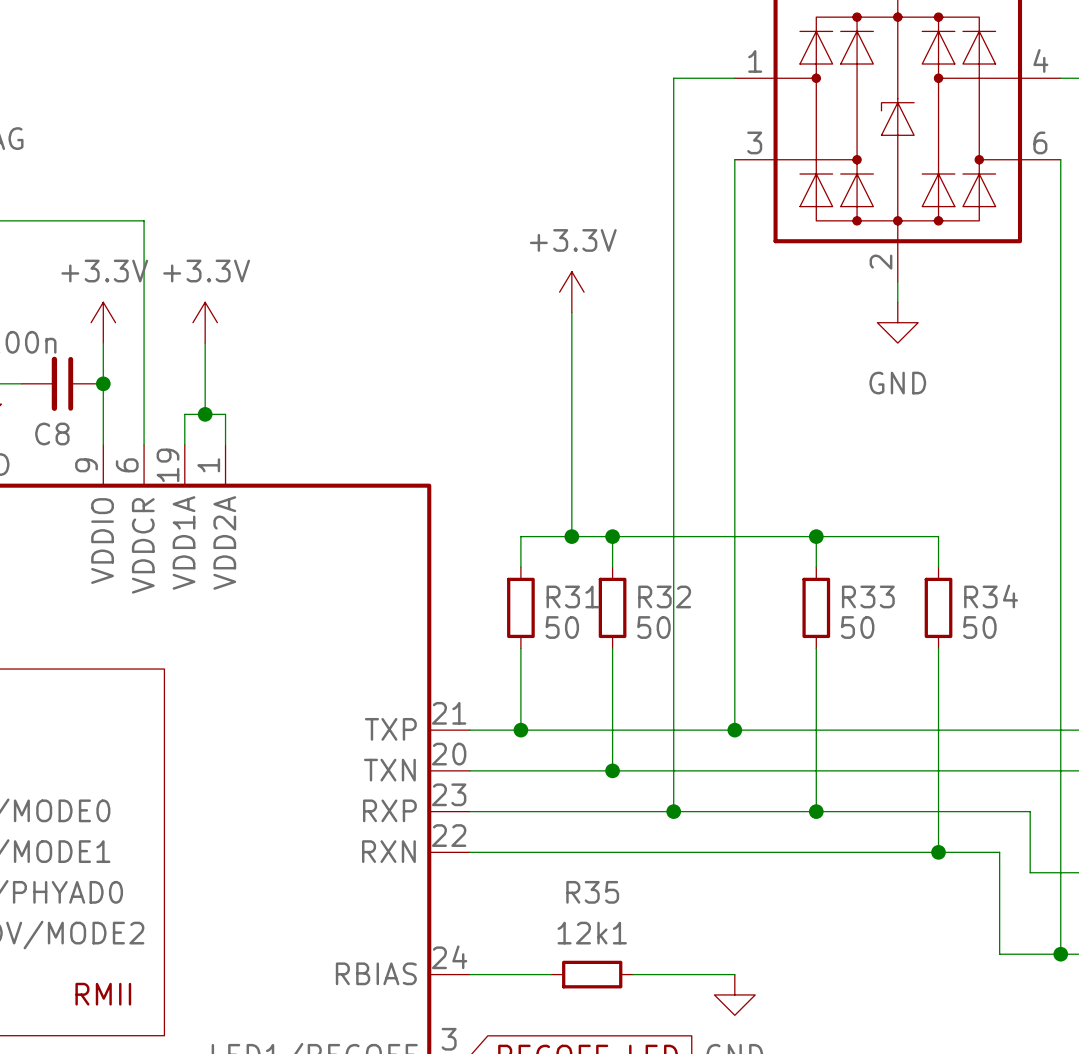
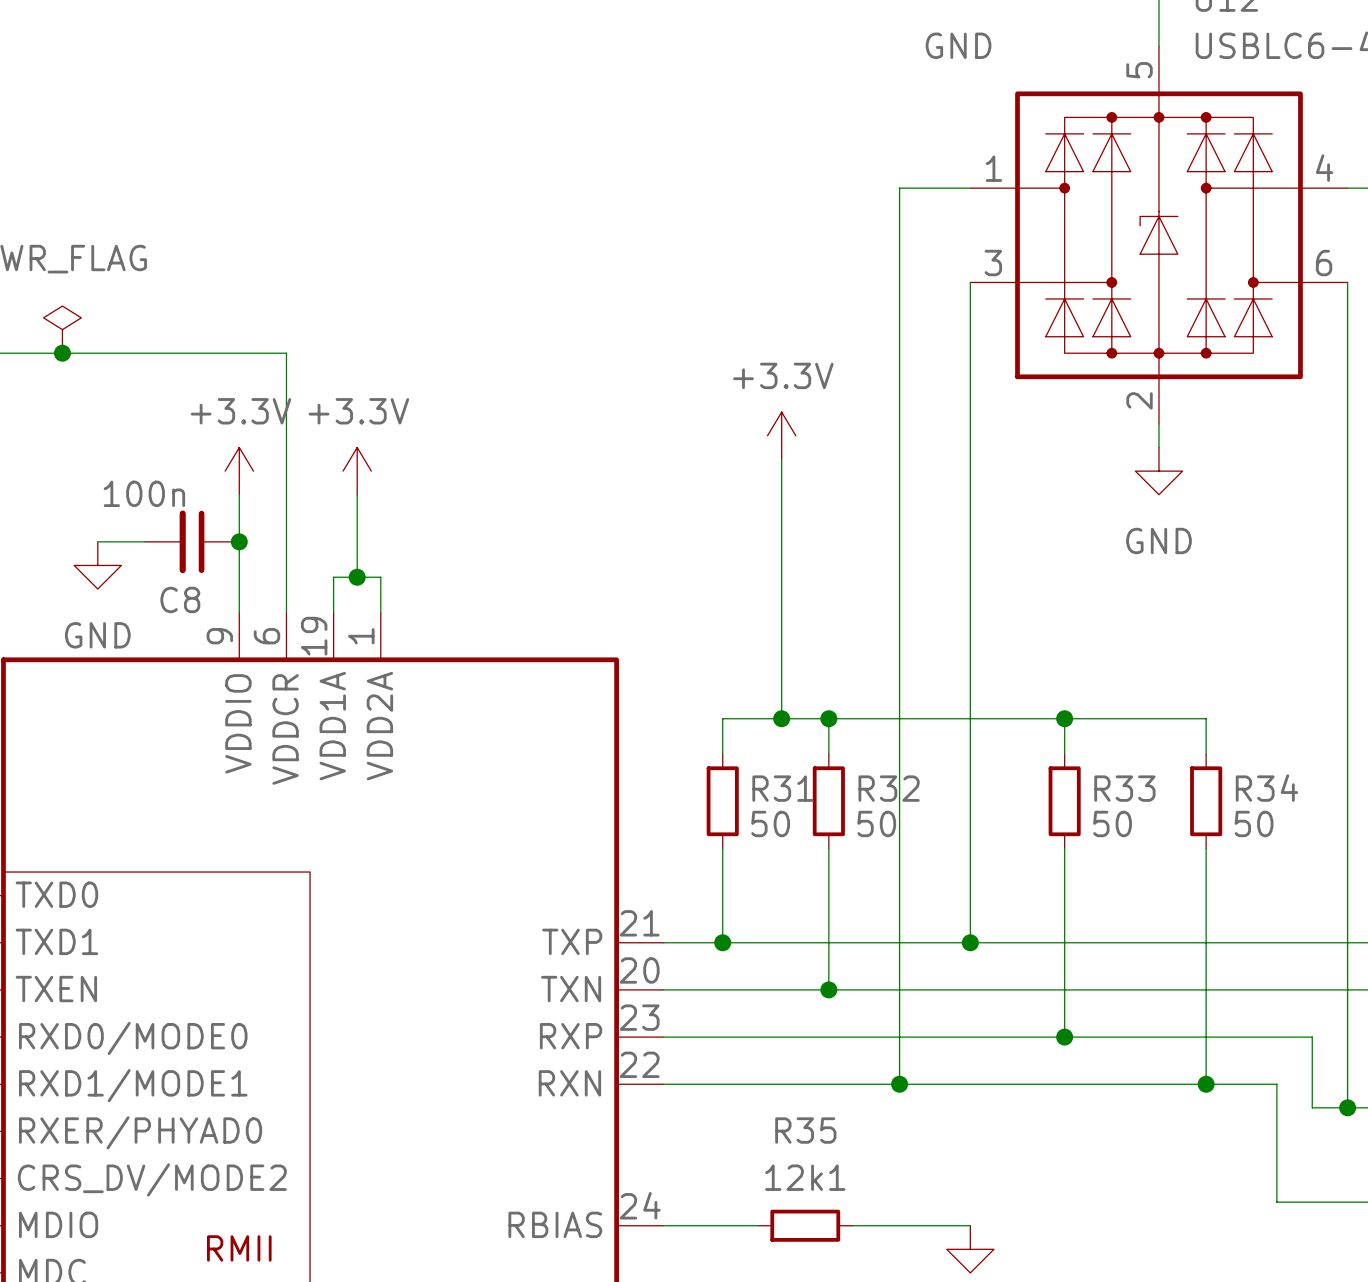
wire: none -> (899, 1037) (899, 1084)
junction position: (673, 811) -> (899, 1084)
wire: (1060, 872) (1060, 954) -> none
junction position: (1060, 954) -> (1347, 1107)

